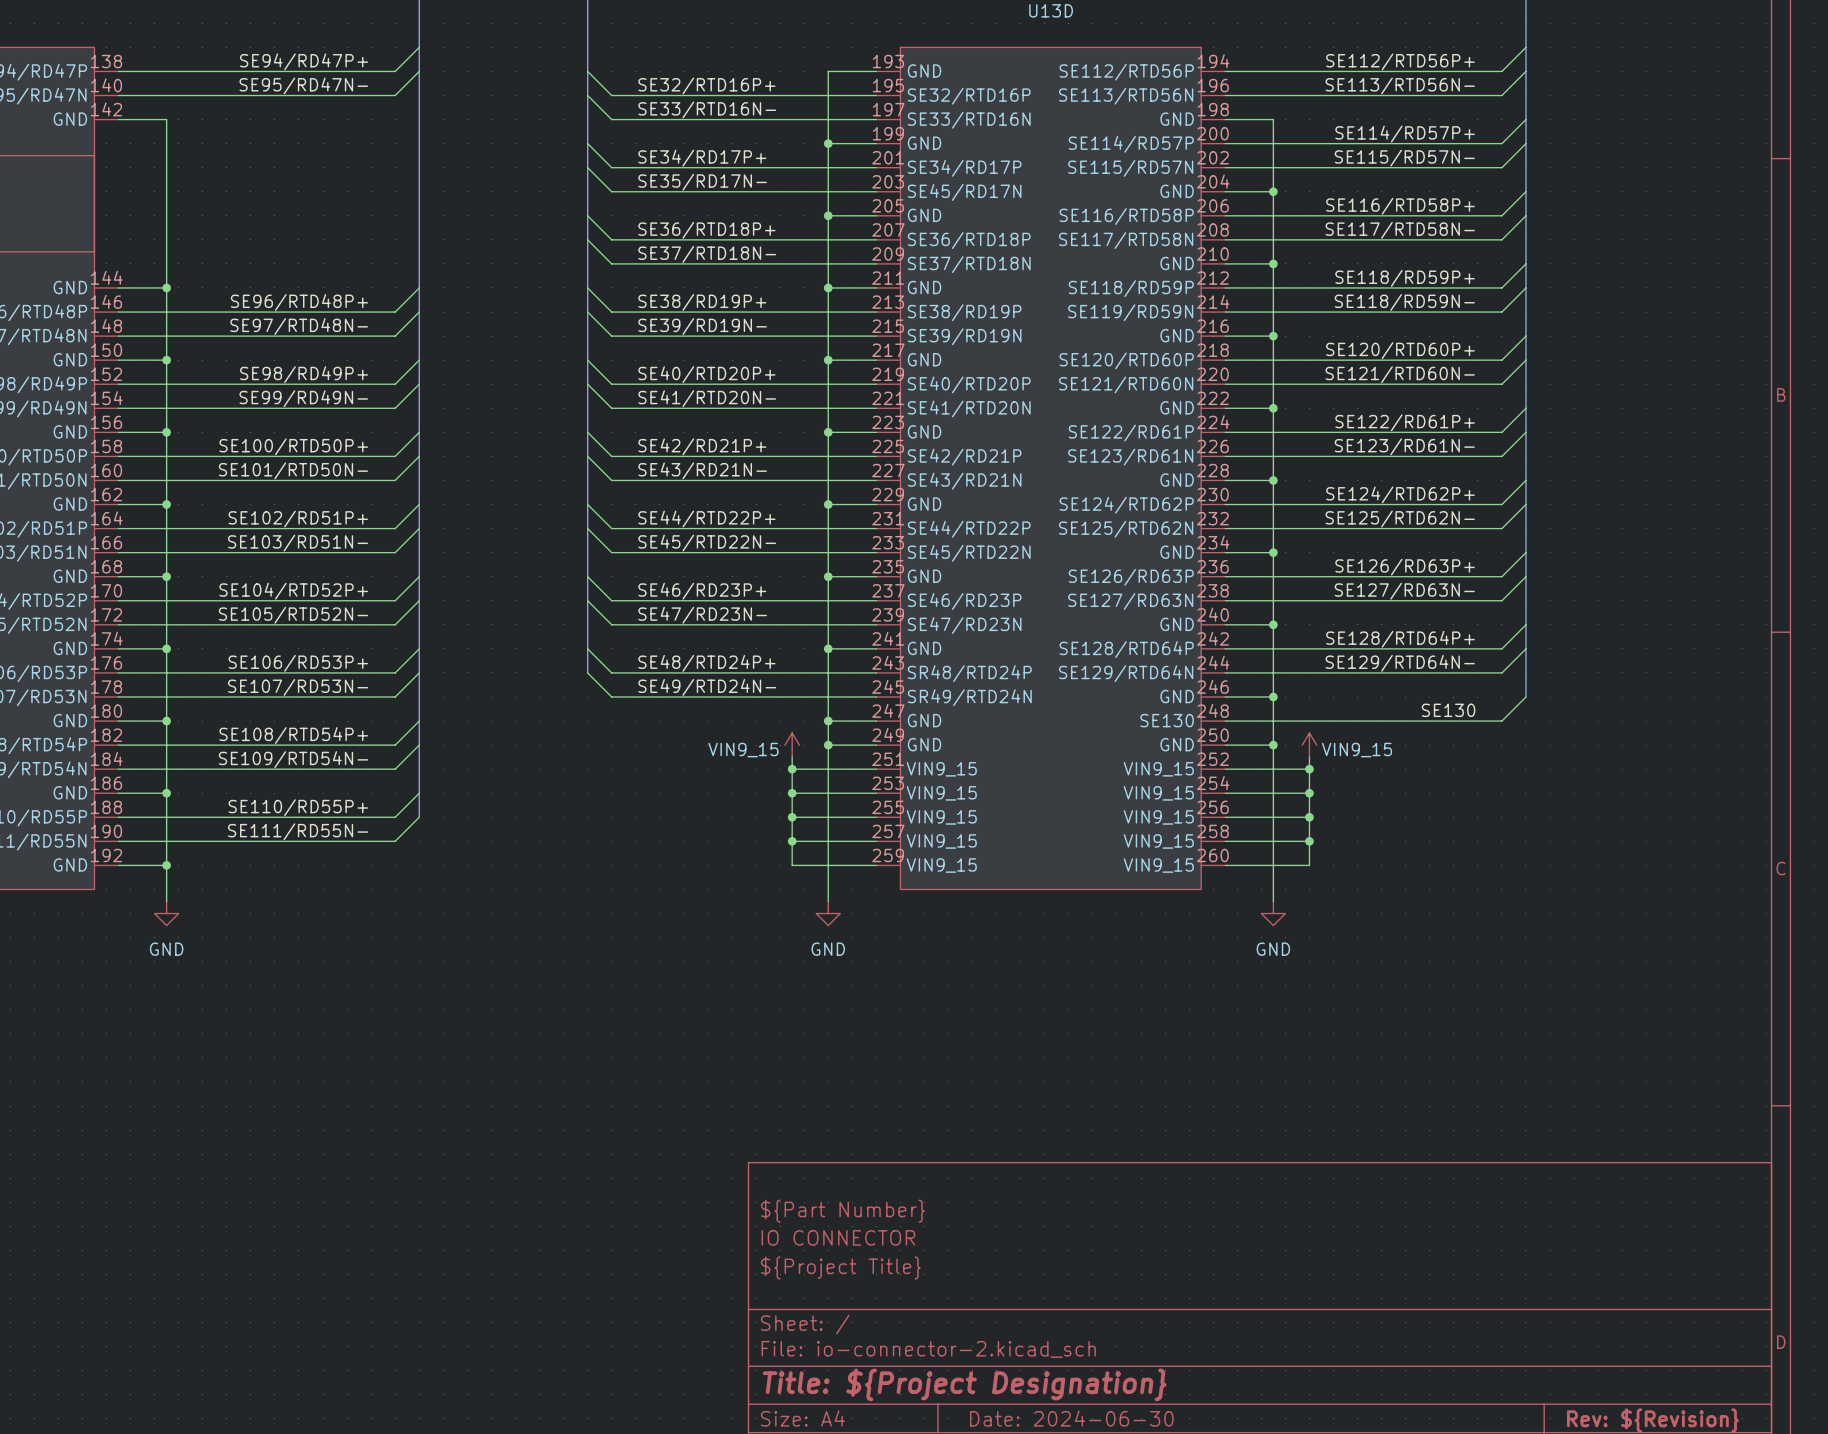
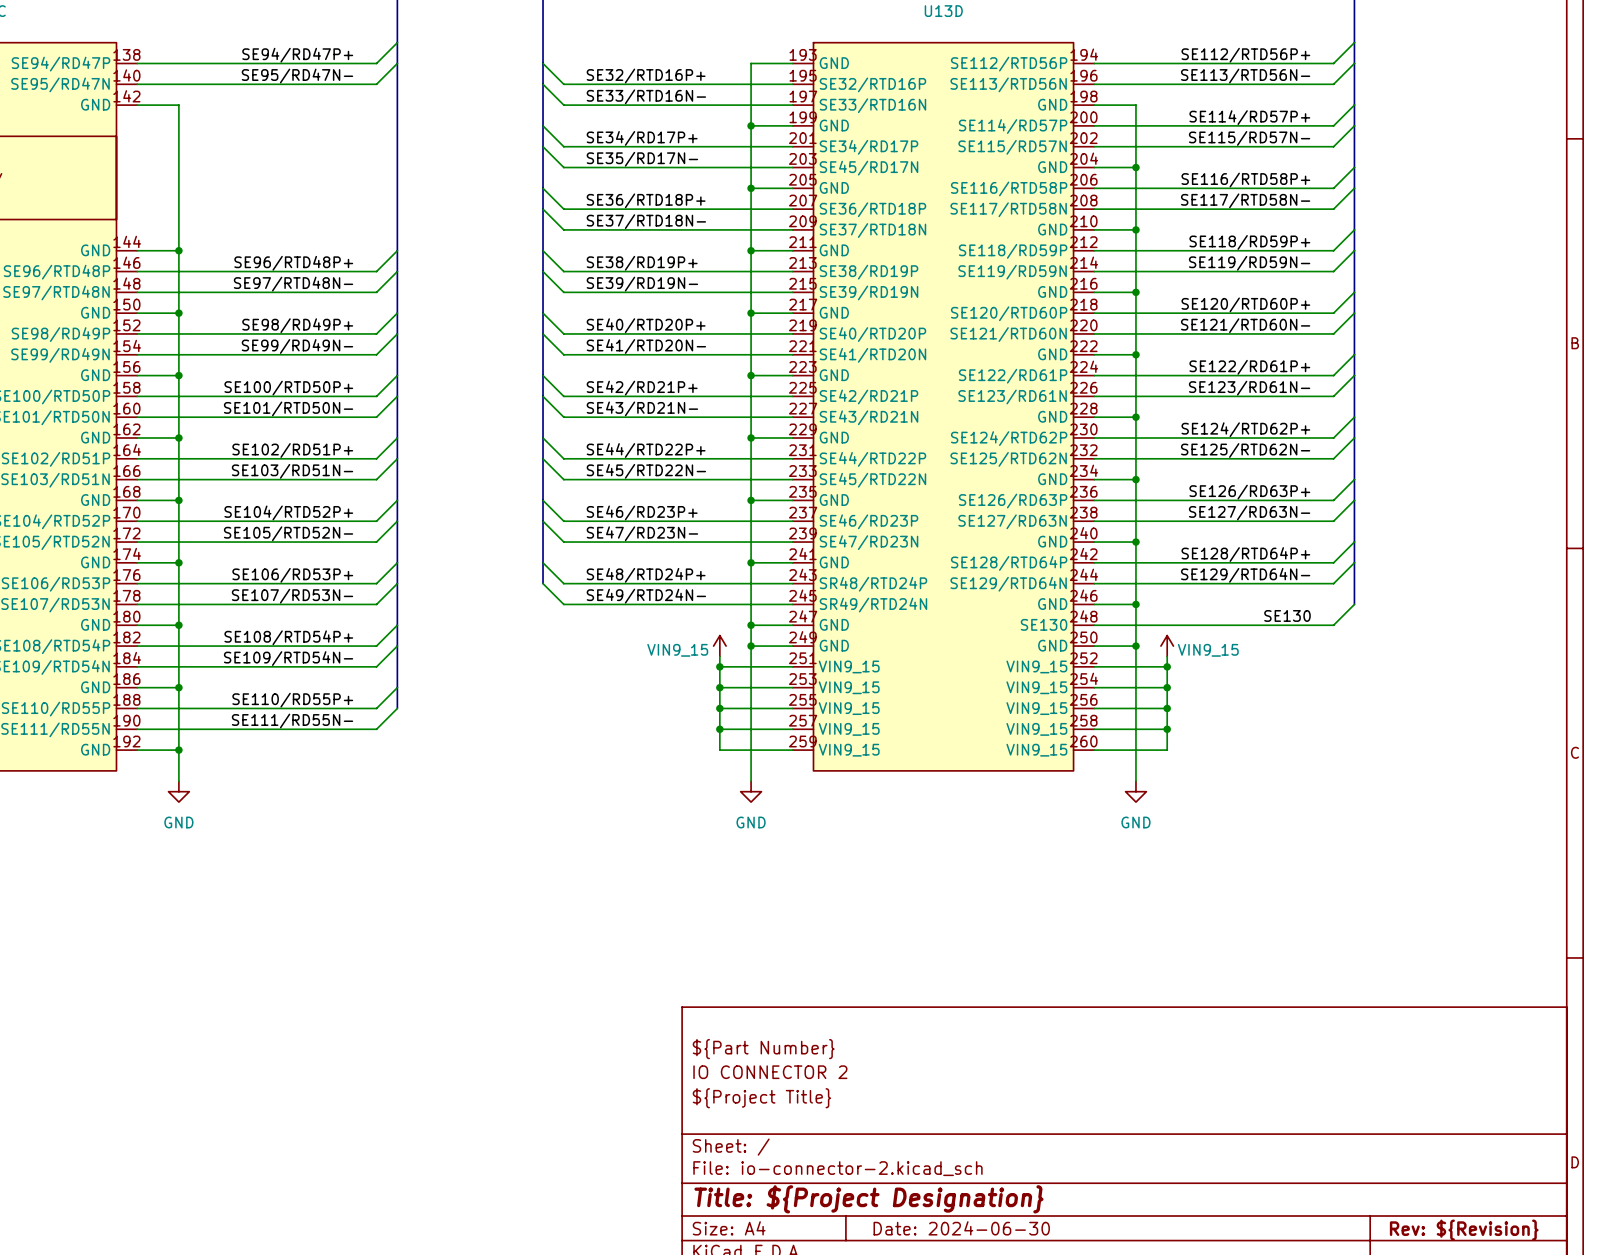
label: SE118/RD59N- (1404, 302) -> SE119/RD59N- (1249, 263)
title block: IO CONNECTOR (838, 1237) -> IO CONNECTOR 2 (770, 1072)

